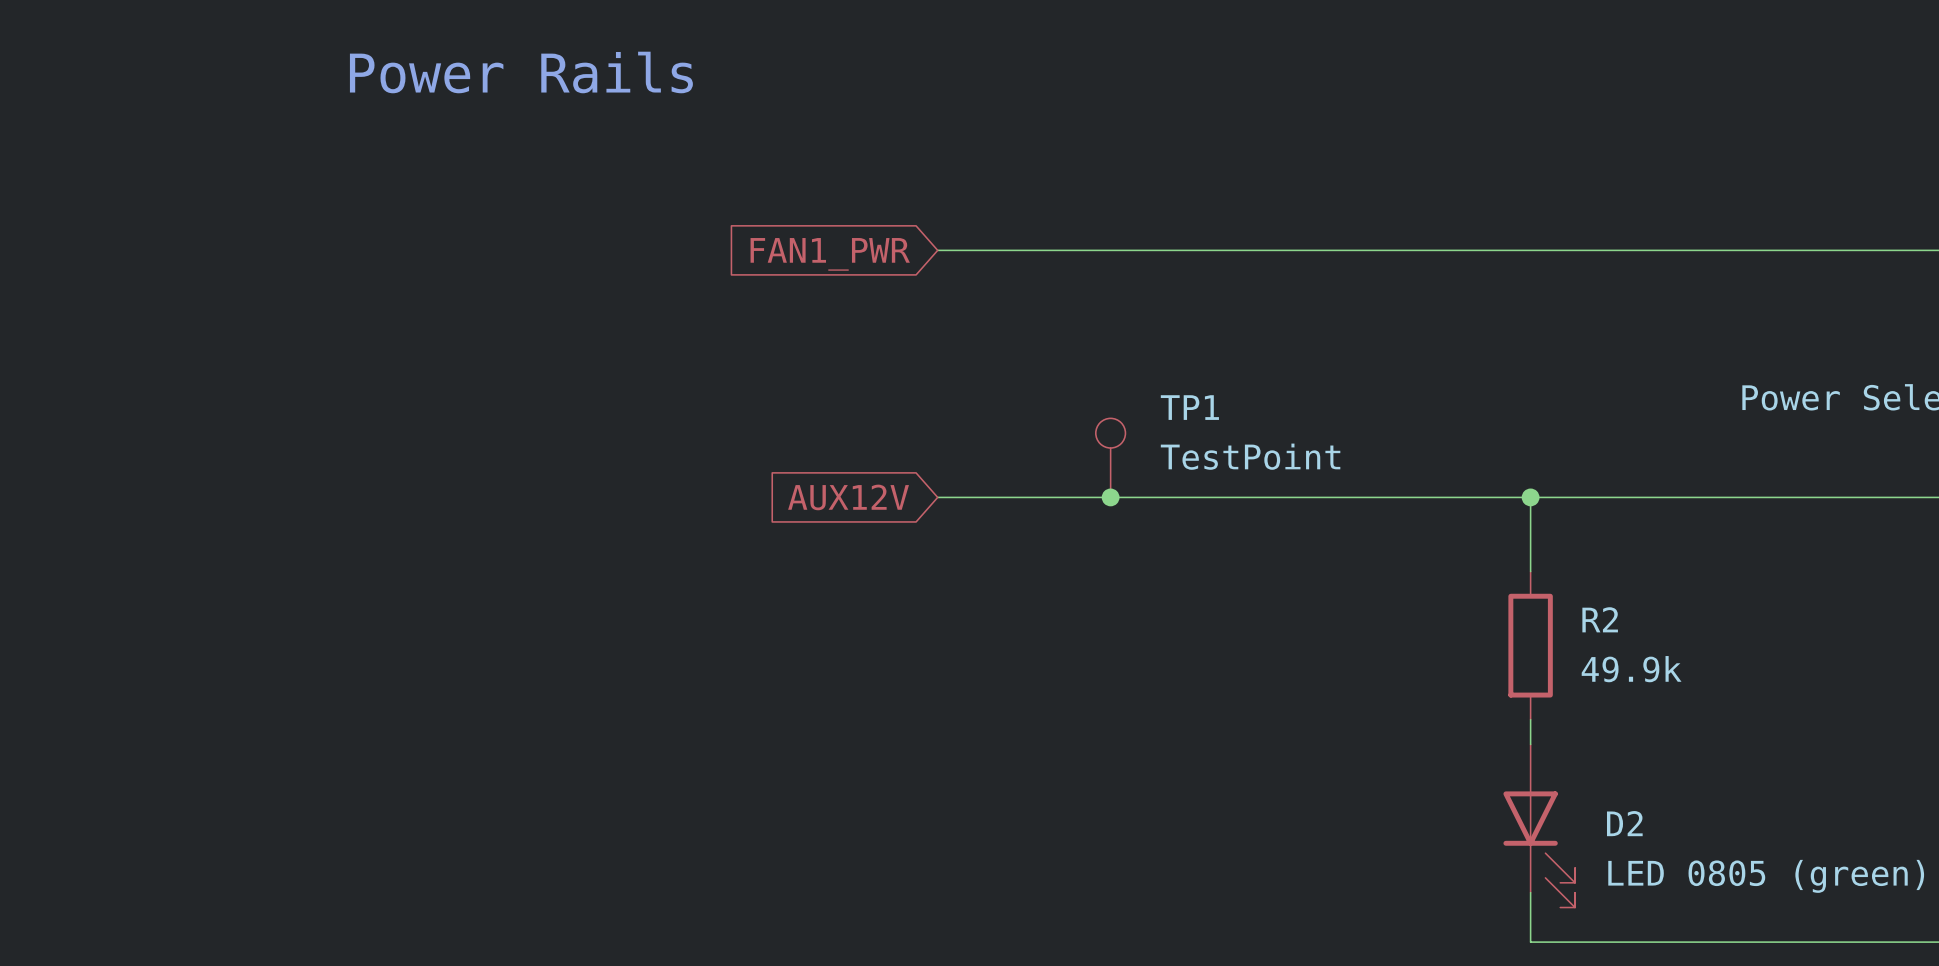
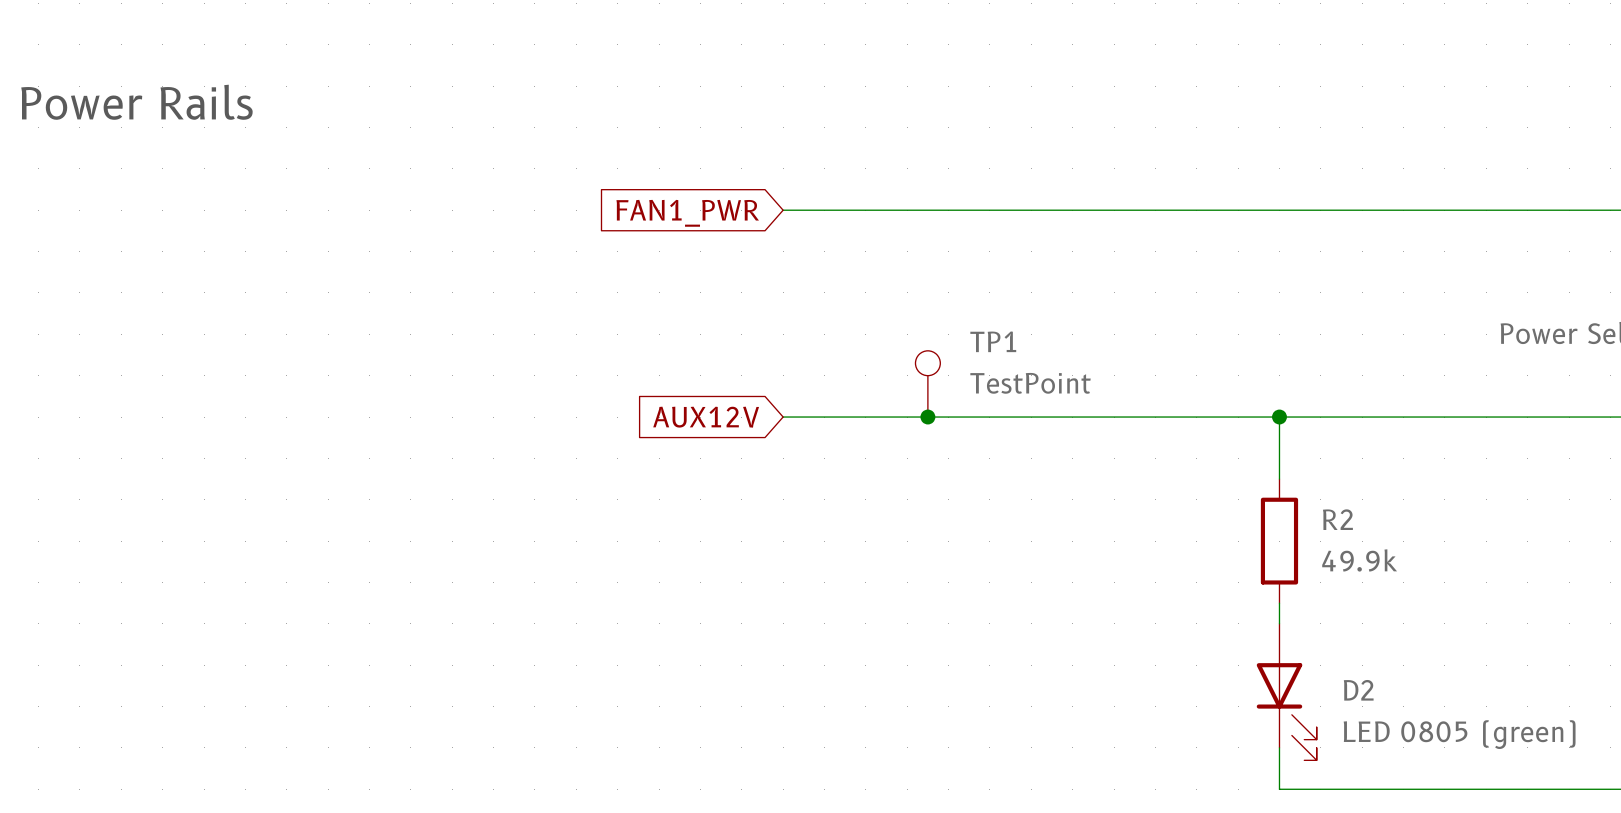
text position: Power Rails (521, 72) -> Power Rails (136, 102)

